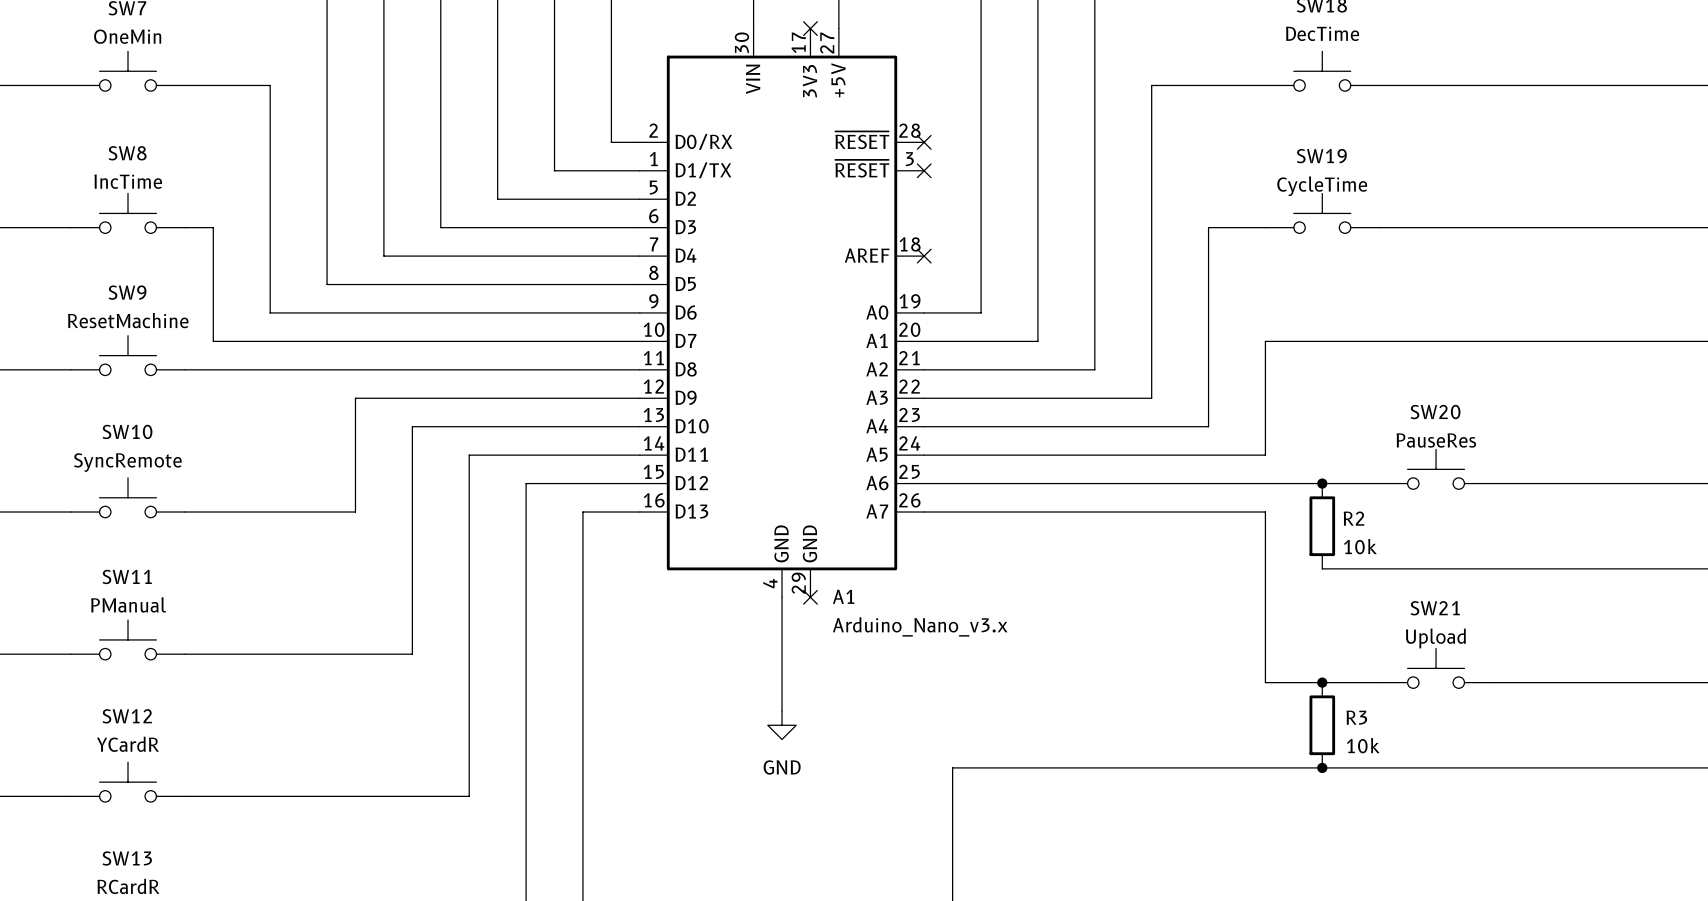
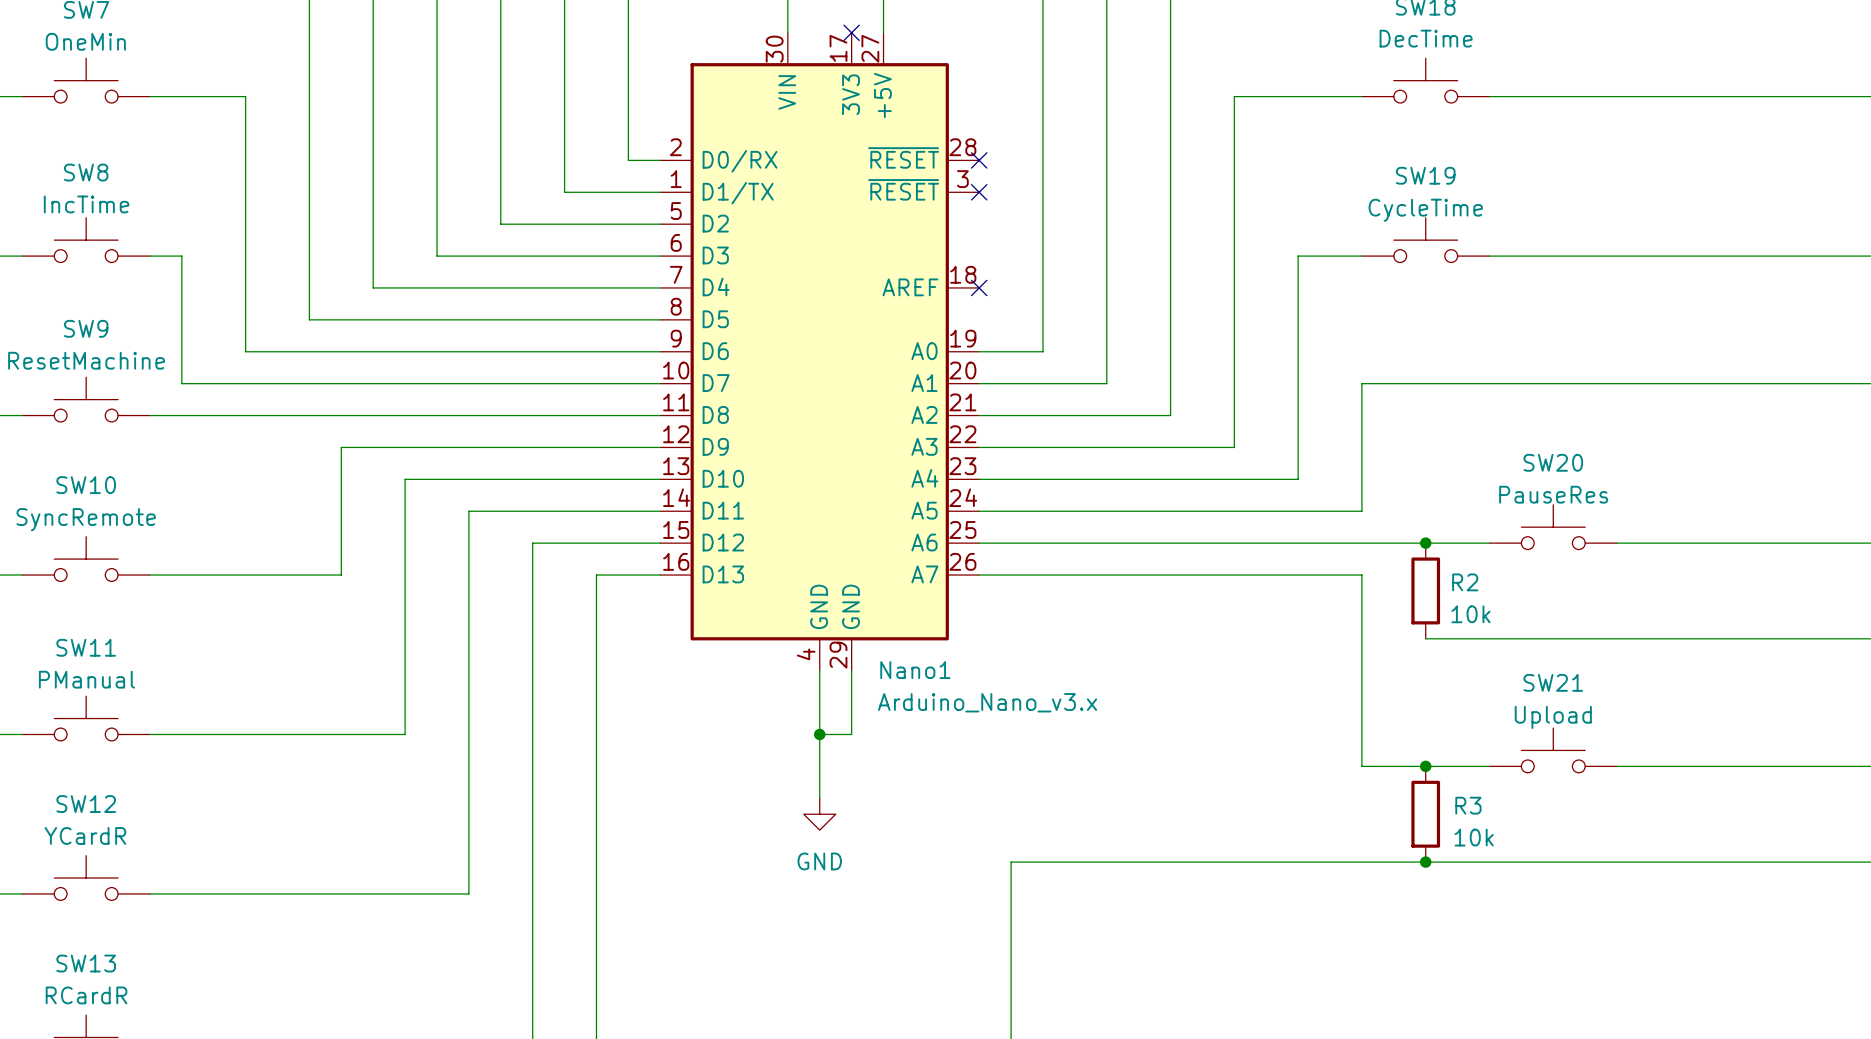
A1 name: A1 (843, 596) -> Nano1 (915, 670)
wire: none -> (851, 670) (851, 734) (819, 734)
no-connect mark: (810, 597) -> none
junction: none -> (819, 734)

